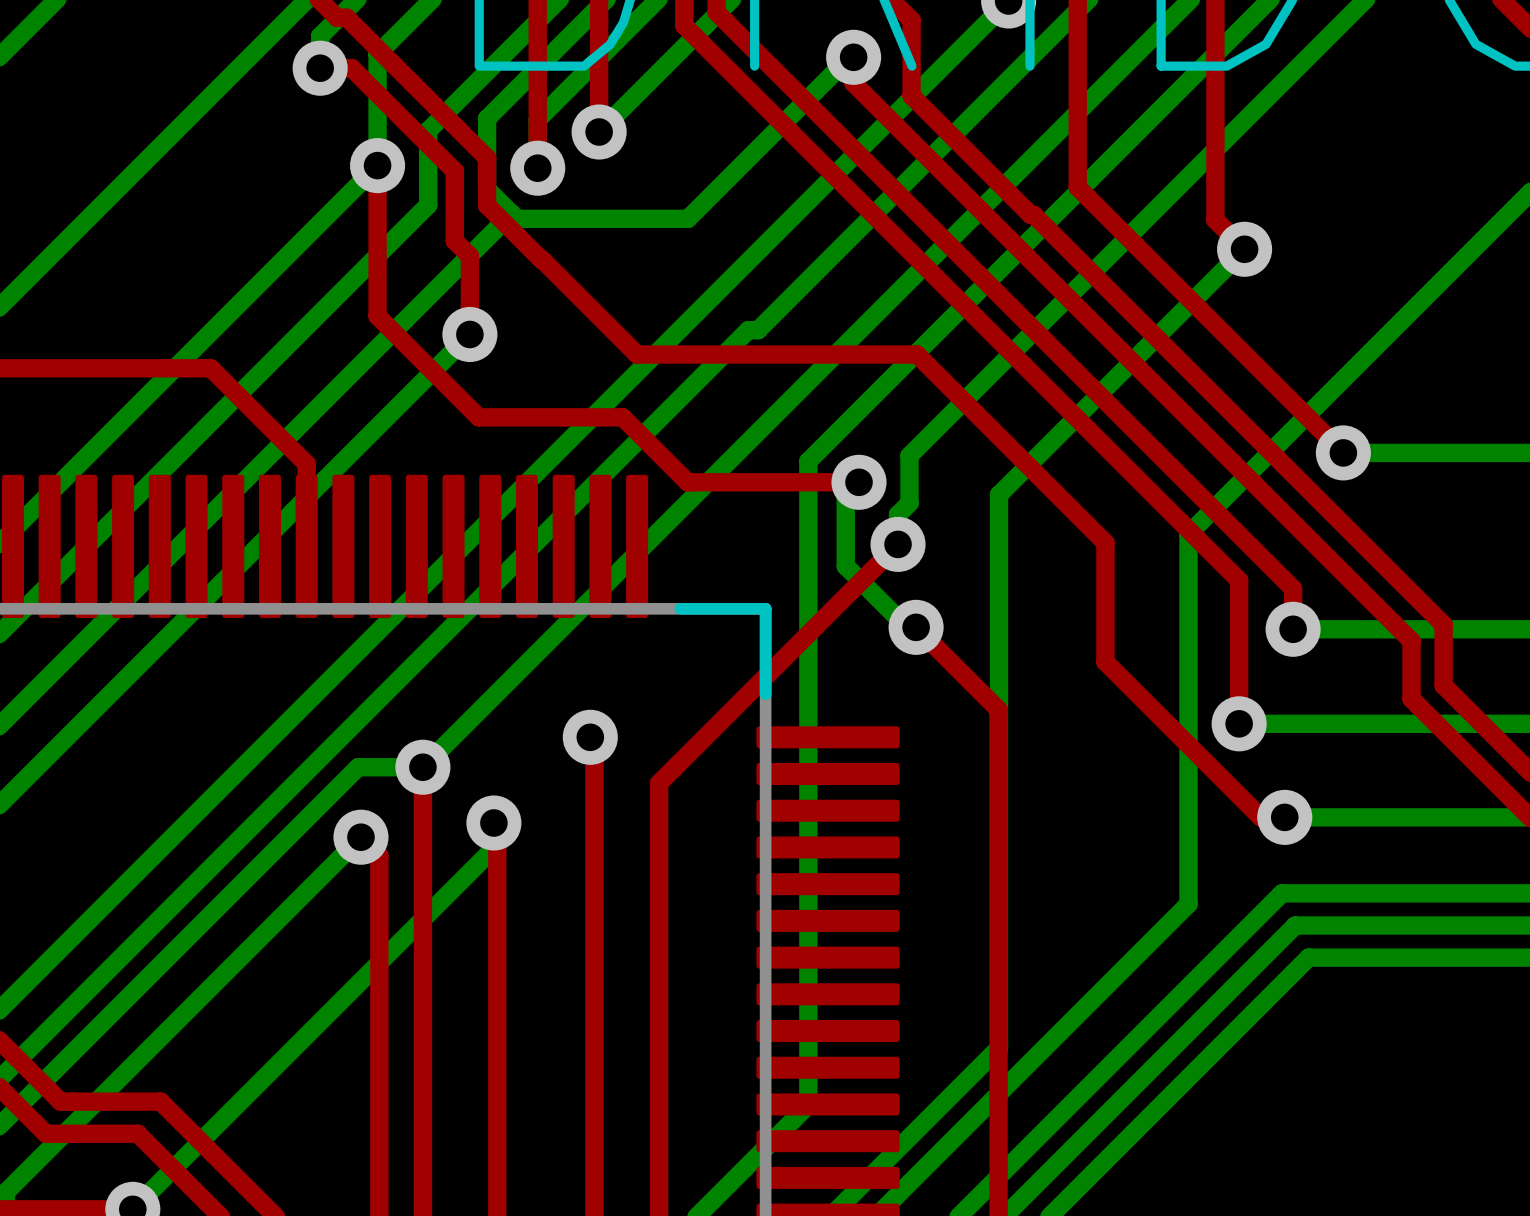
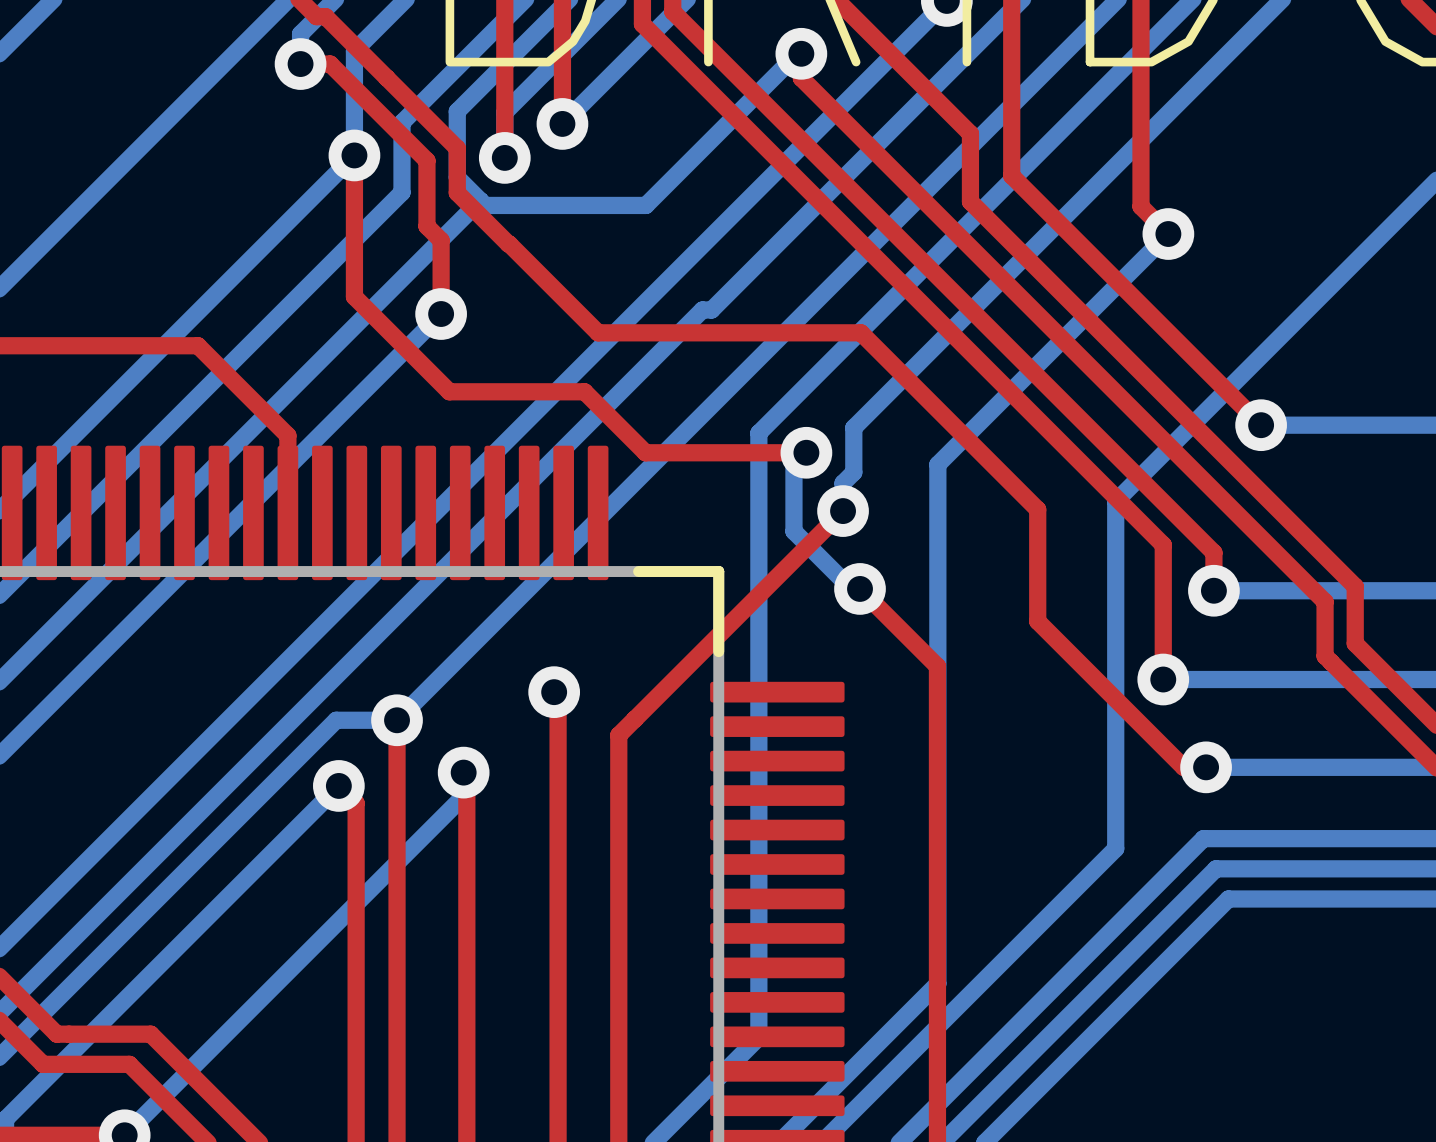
top track: (911, 20) (911, 95) (1030, 214) (1033, 214) -> (855, 19) (970, 133) (970, 201)

